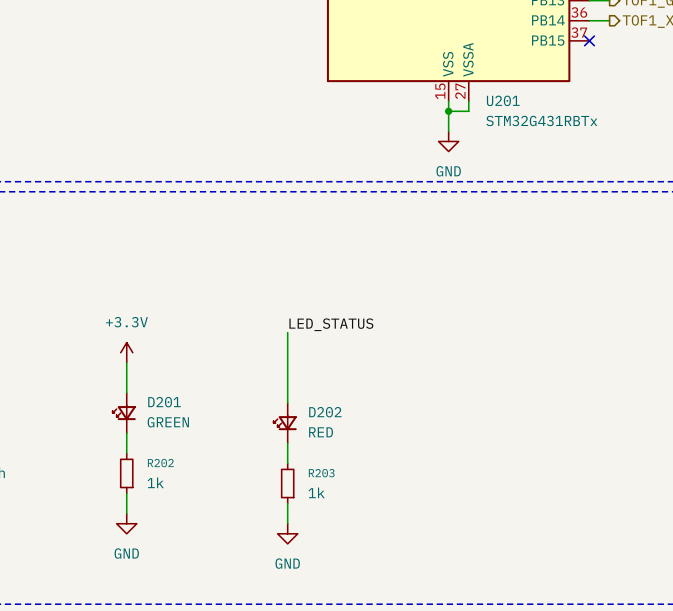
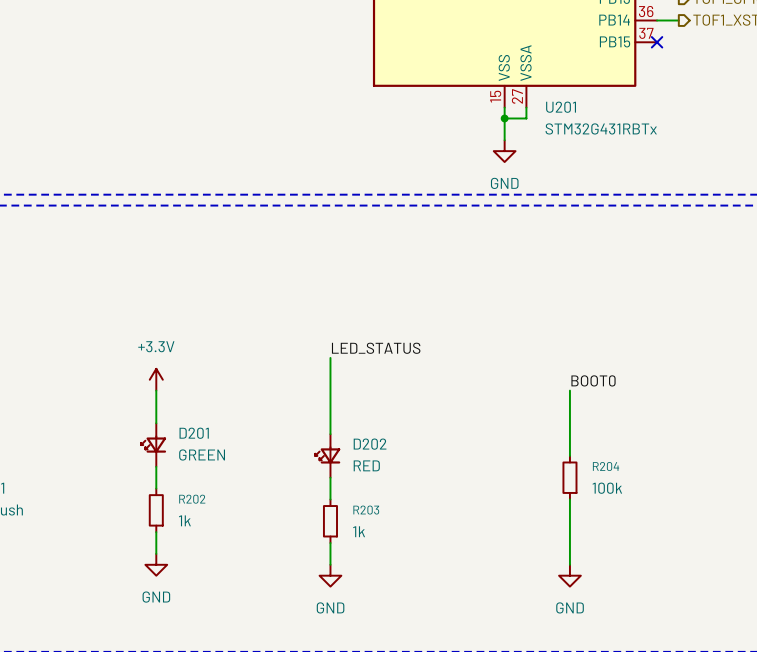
label: none -> BOOT0 (593, 380)
wire: none -> (569, 390) (569, 455)
R204: none -> 100k (569, 477)
wire: none -> (569, 499) (569, 564)
power symbol: none -> GND (569, 575)

